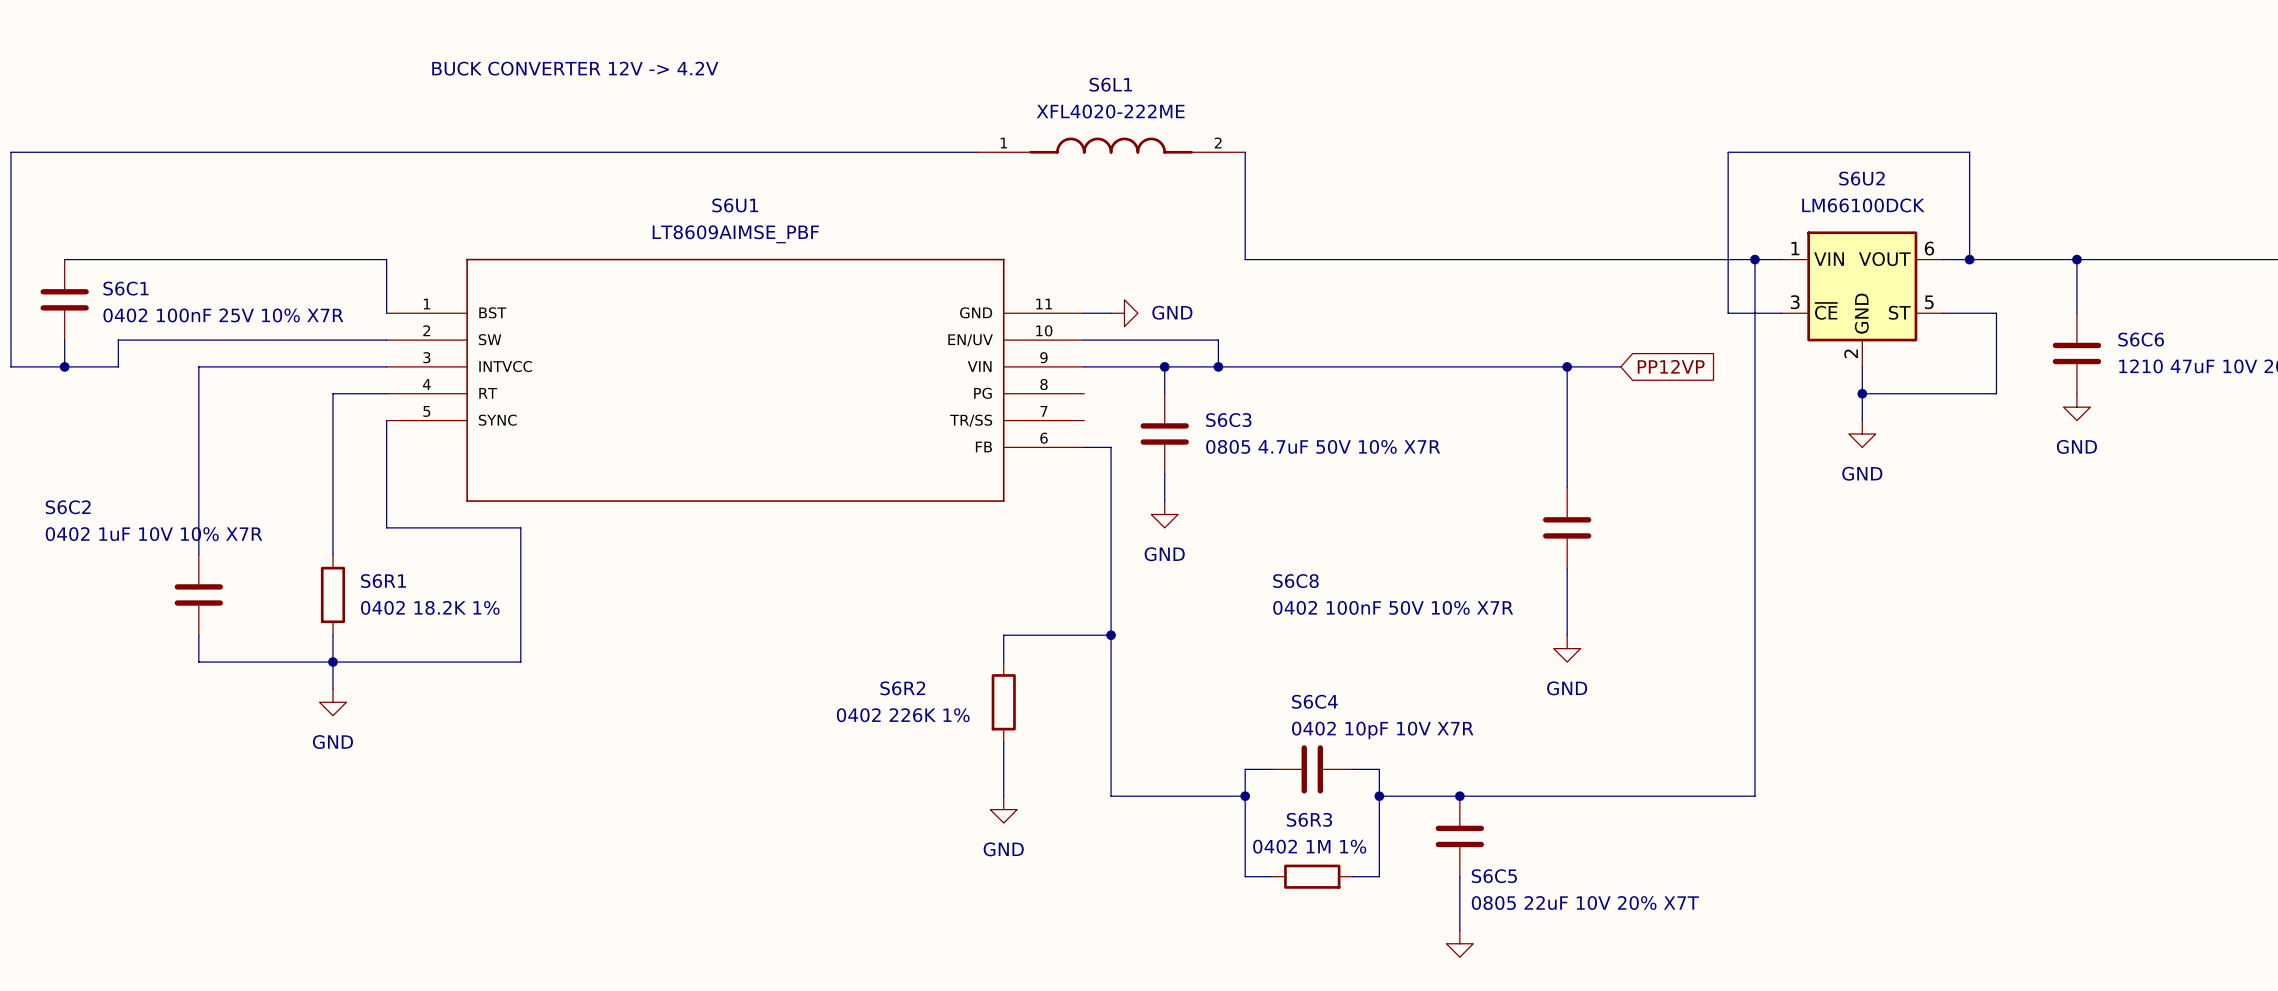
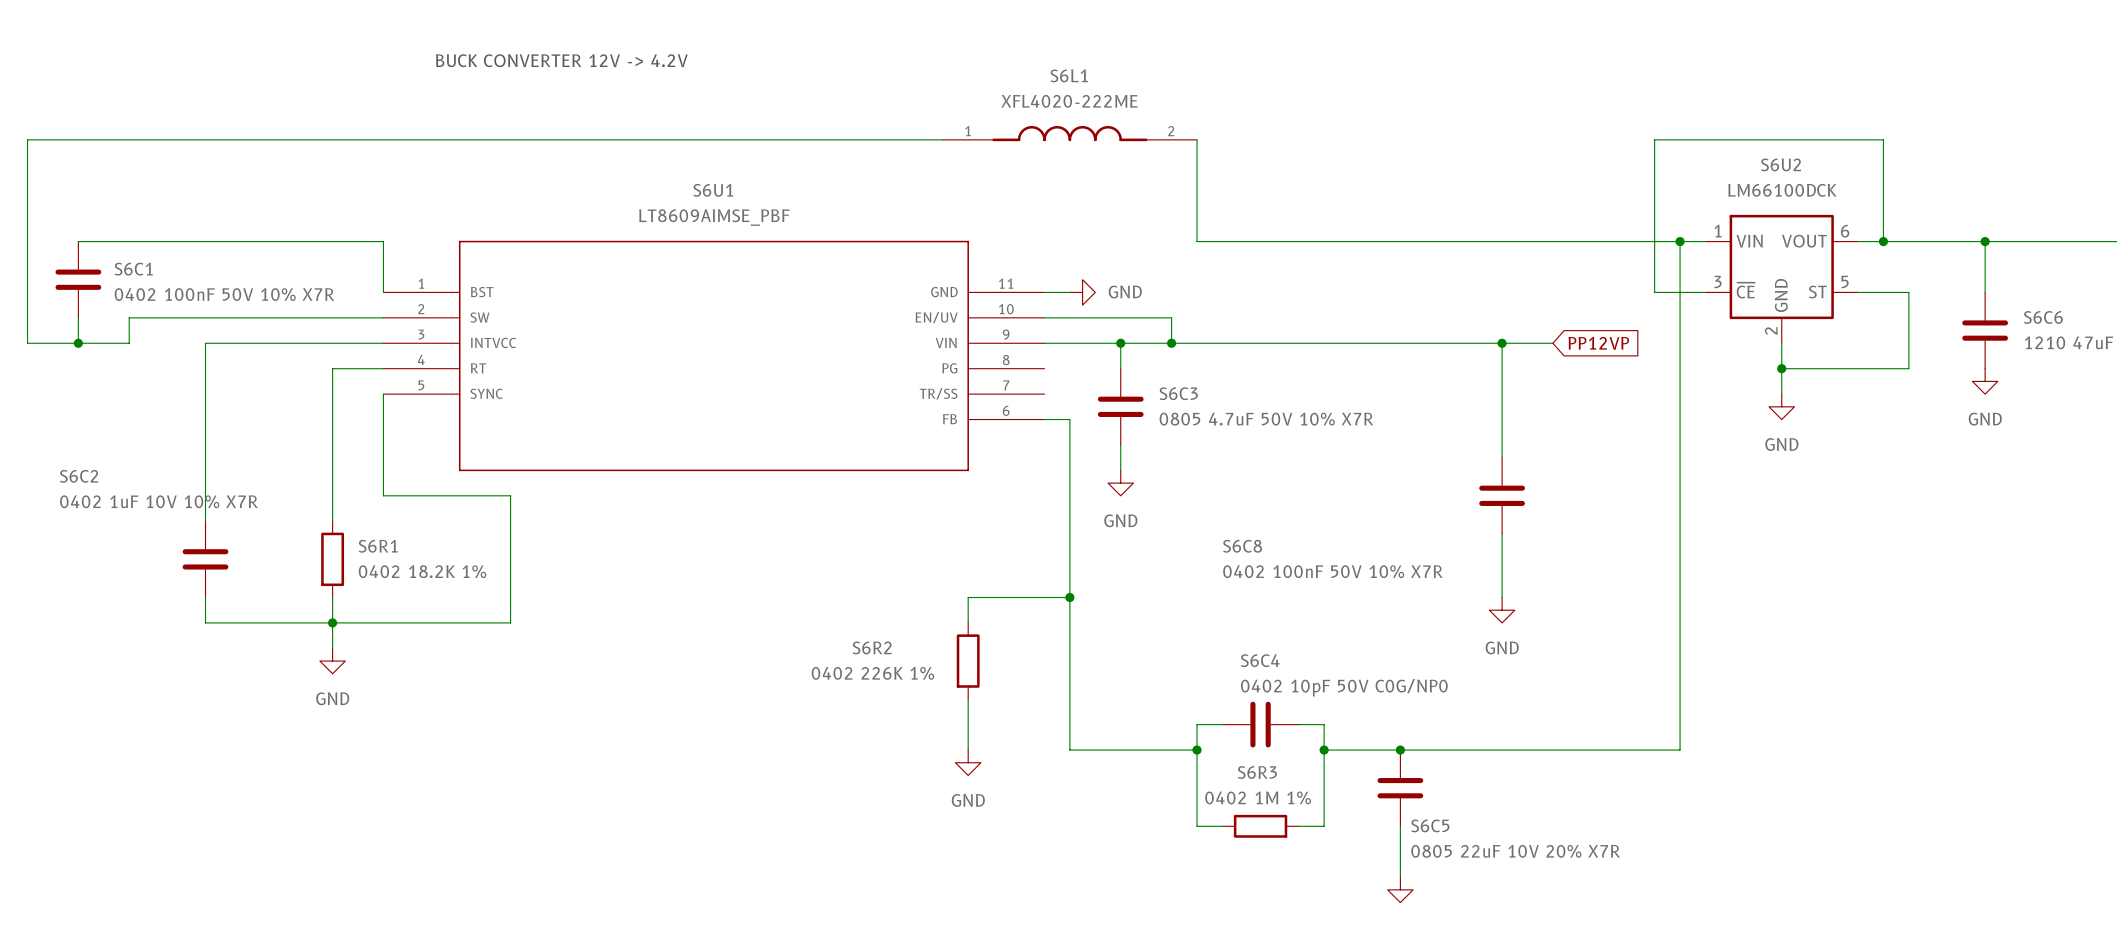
S6C1 value: 0402 100nF 25V 10% X7R (223, 315) -> 0402 100nF 50V 10% X7R (224, 294)
S6C4 value: 0402 10pF 10V X7R (1382, 730) -> 0402 10pF 50V C0G/NP0 (1344, 687)
S6C5 value: 0805 22uF 10V 20% X7T (1585, 903) -> 0805 22uF 10V 20% X7R (1515, 851)

